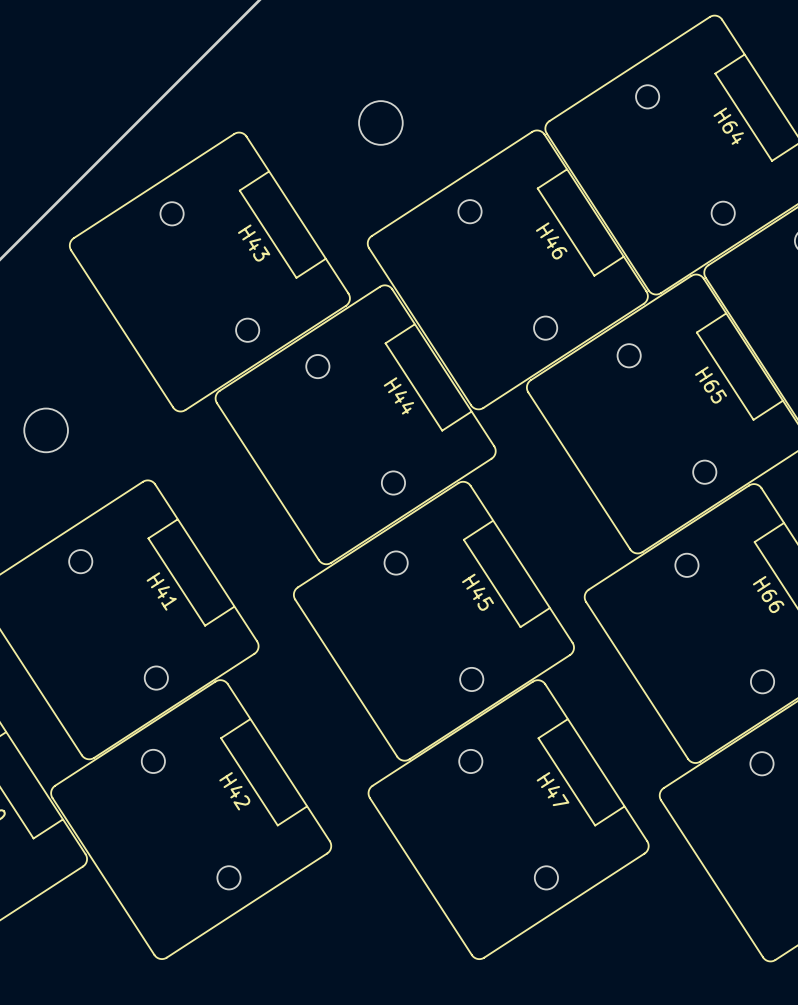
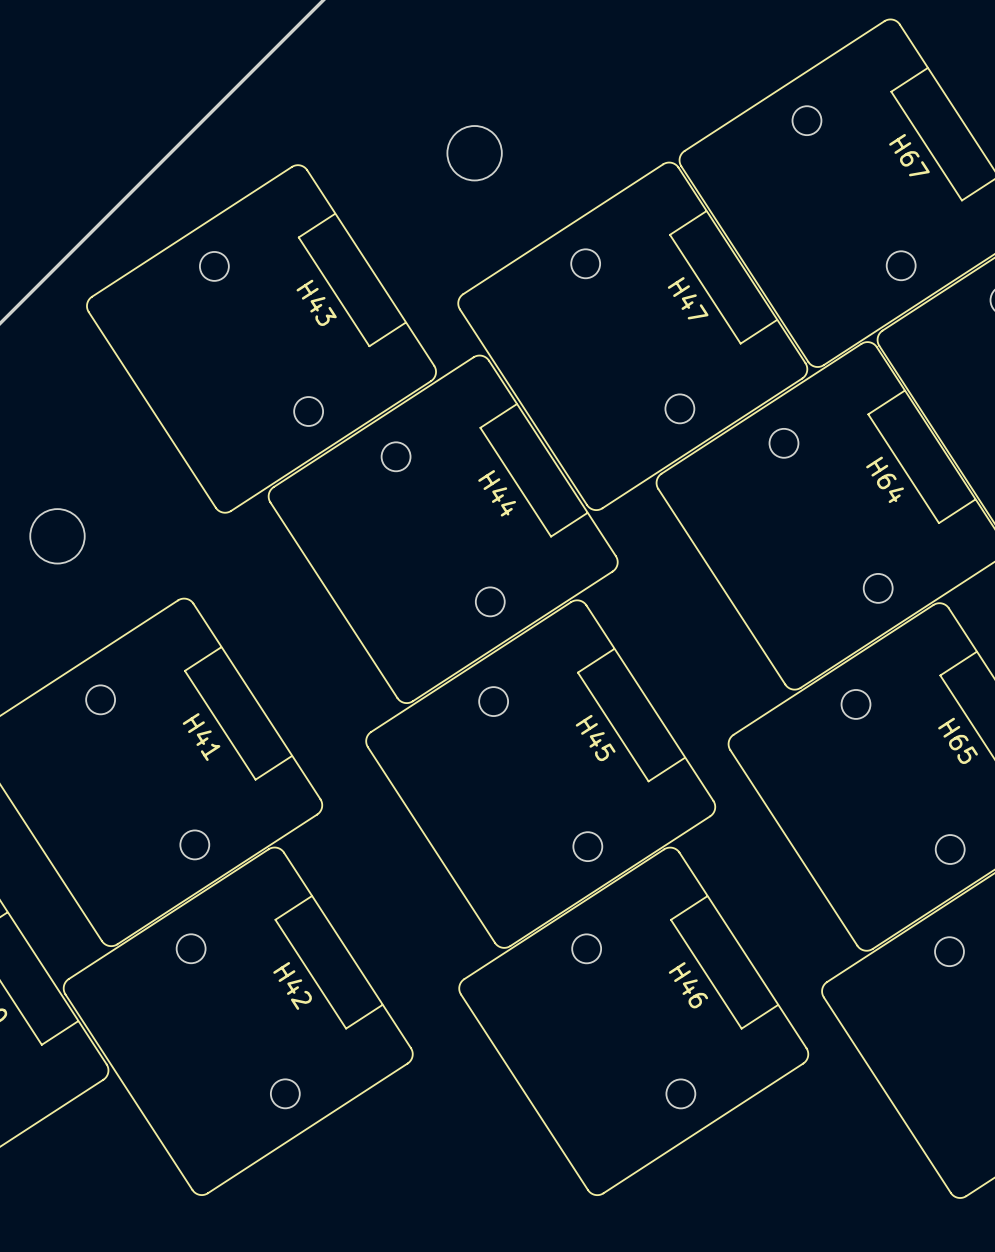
H64 name: H64 (728, 126) -> H67 (909, 155)
H46 name: H46 (551, 240) -> H47 (688, 298)
H65 name: H65 (711, 385) -> H64 (885, 479)
H66 name: H66 (768, 594) -> H65 (958, 740)
H47 name: H47 (553, 789) -> H46 (688, 985)

